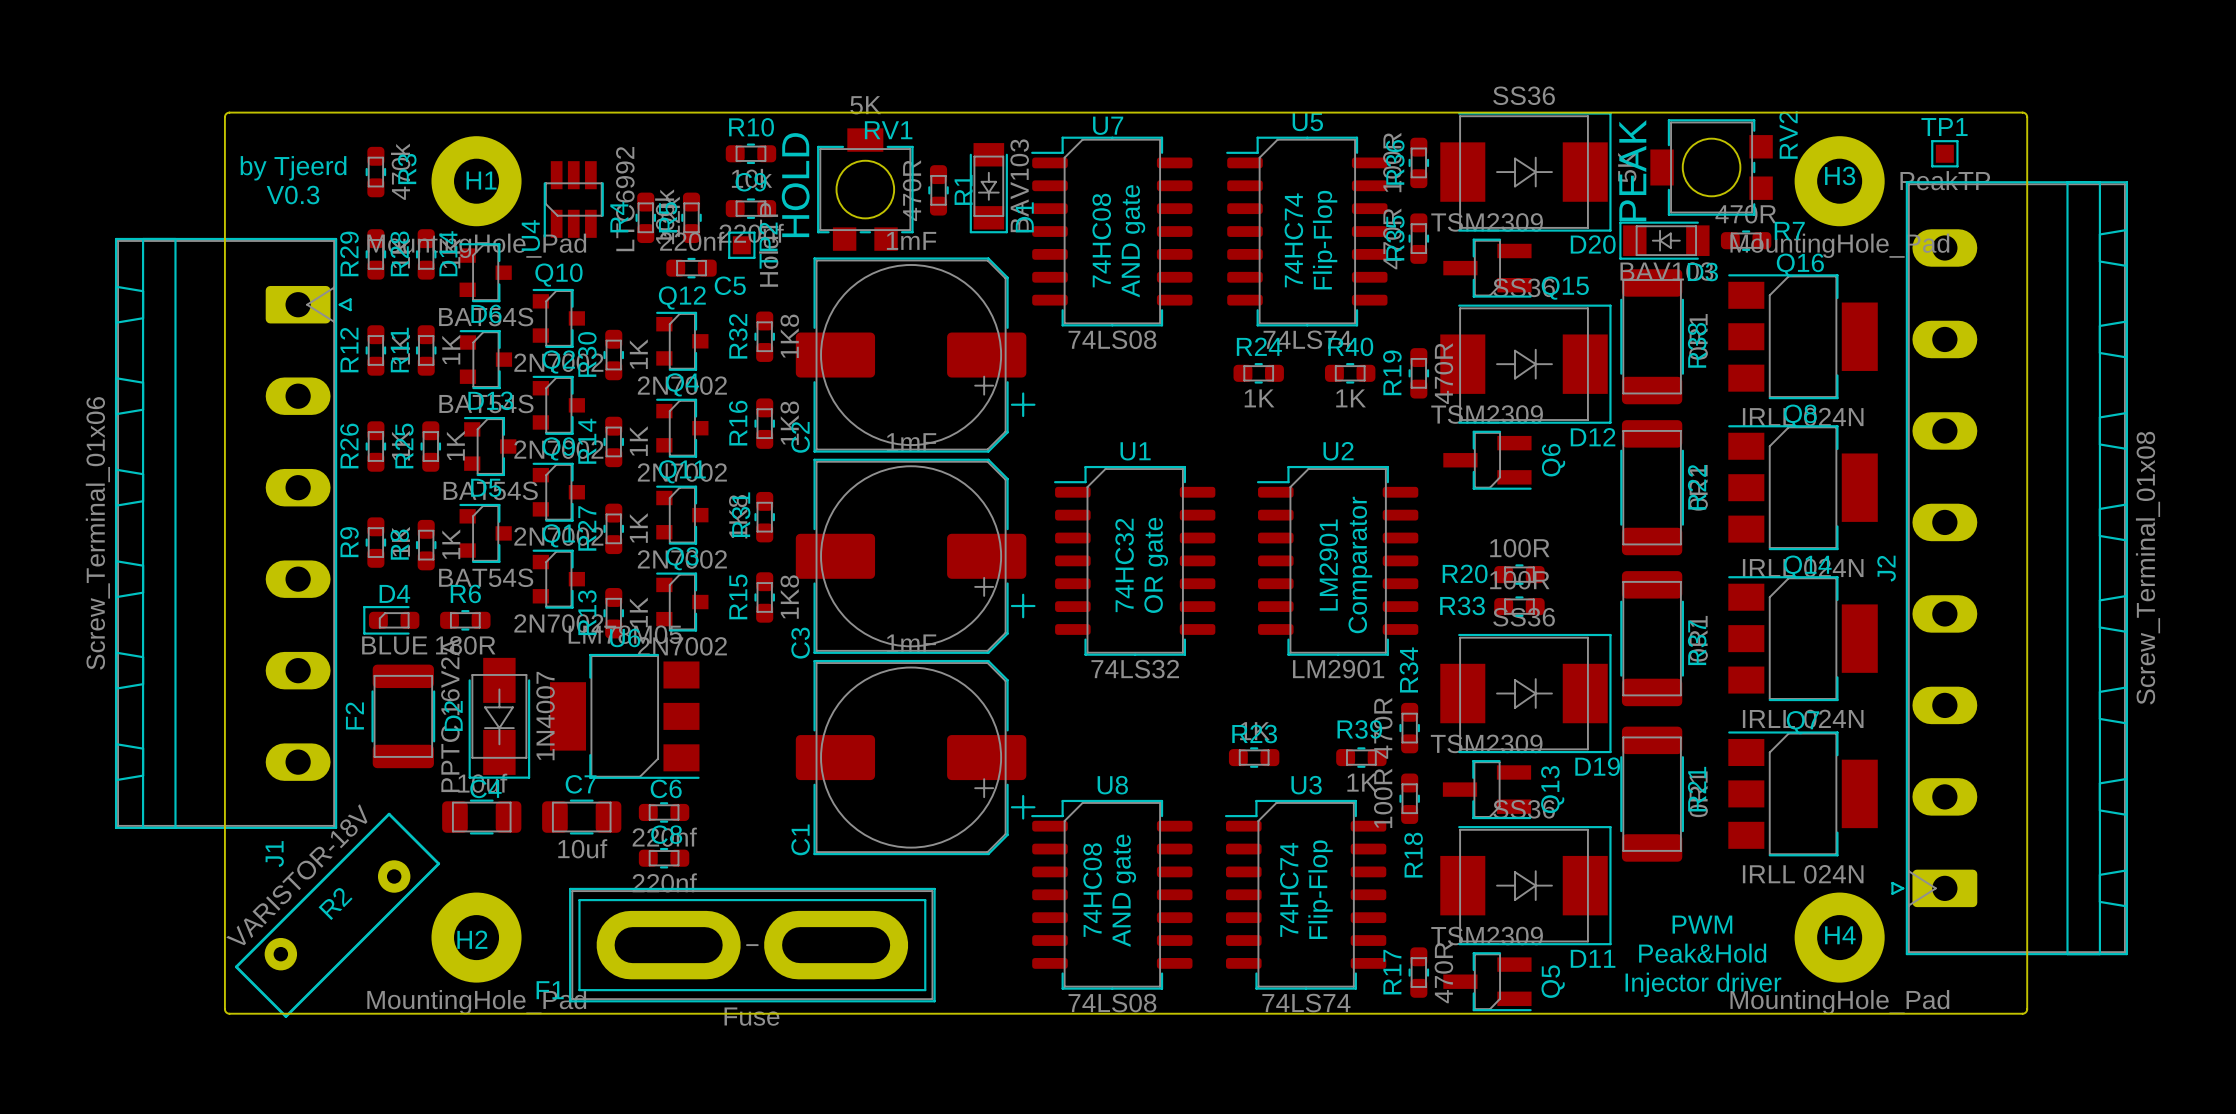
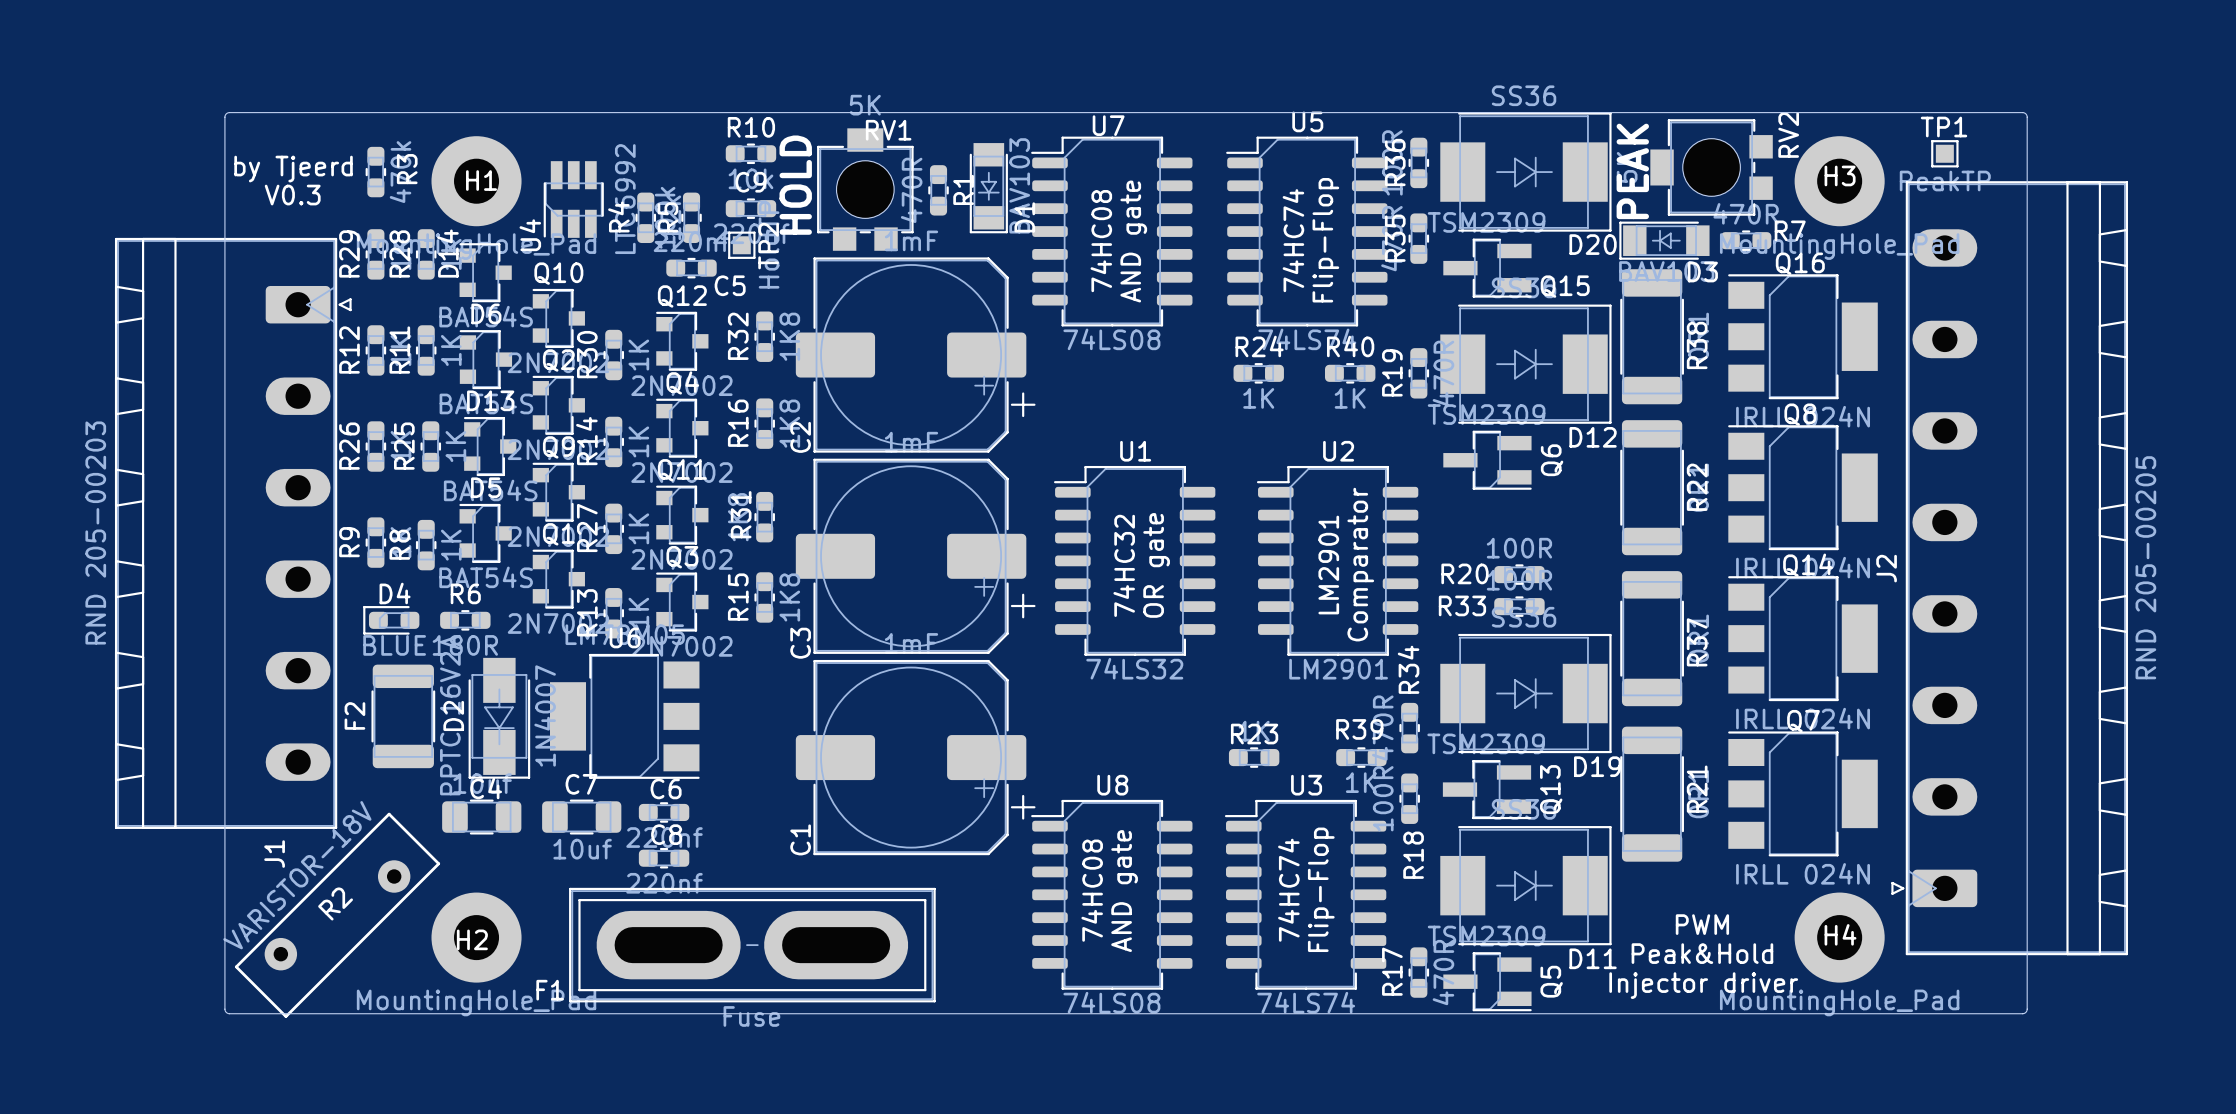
J1 value: Screw_Terminal_01x06 (97, 533) -> RND 205-00203 (95, 533)
J2 value: Screw_Terminal_01x08 (2148, 568) -> RND 205-00205 (2145, 567)

